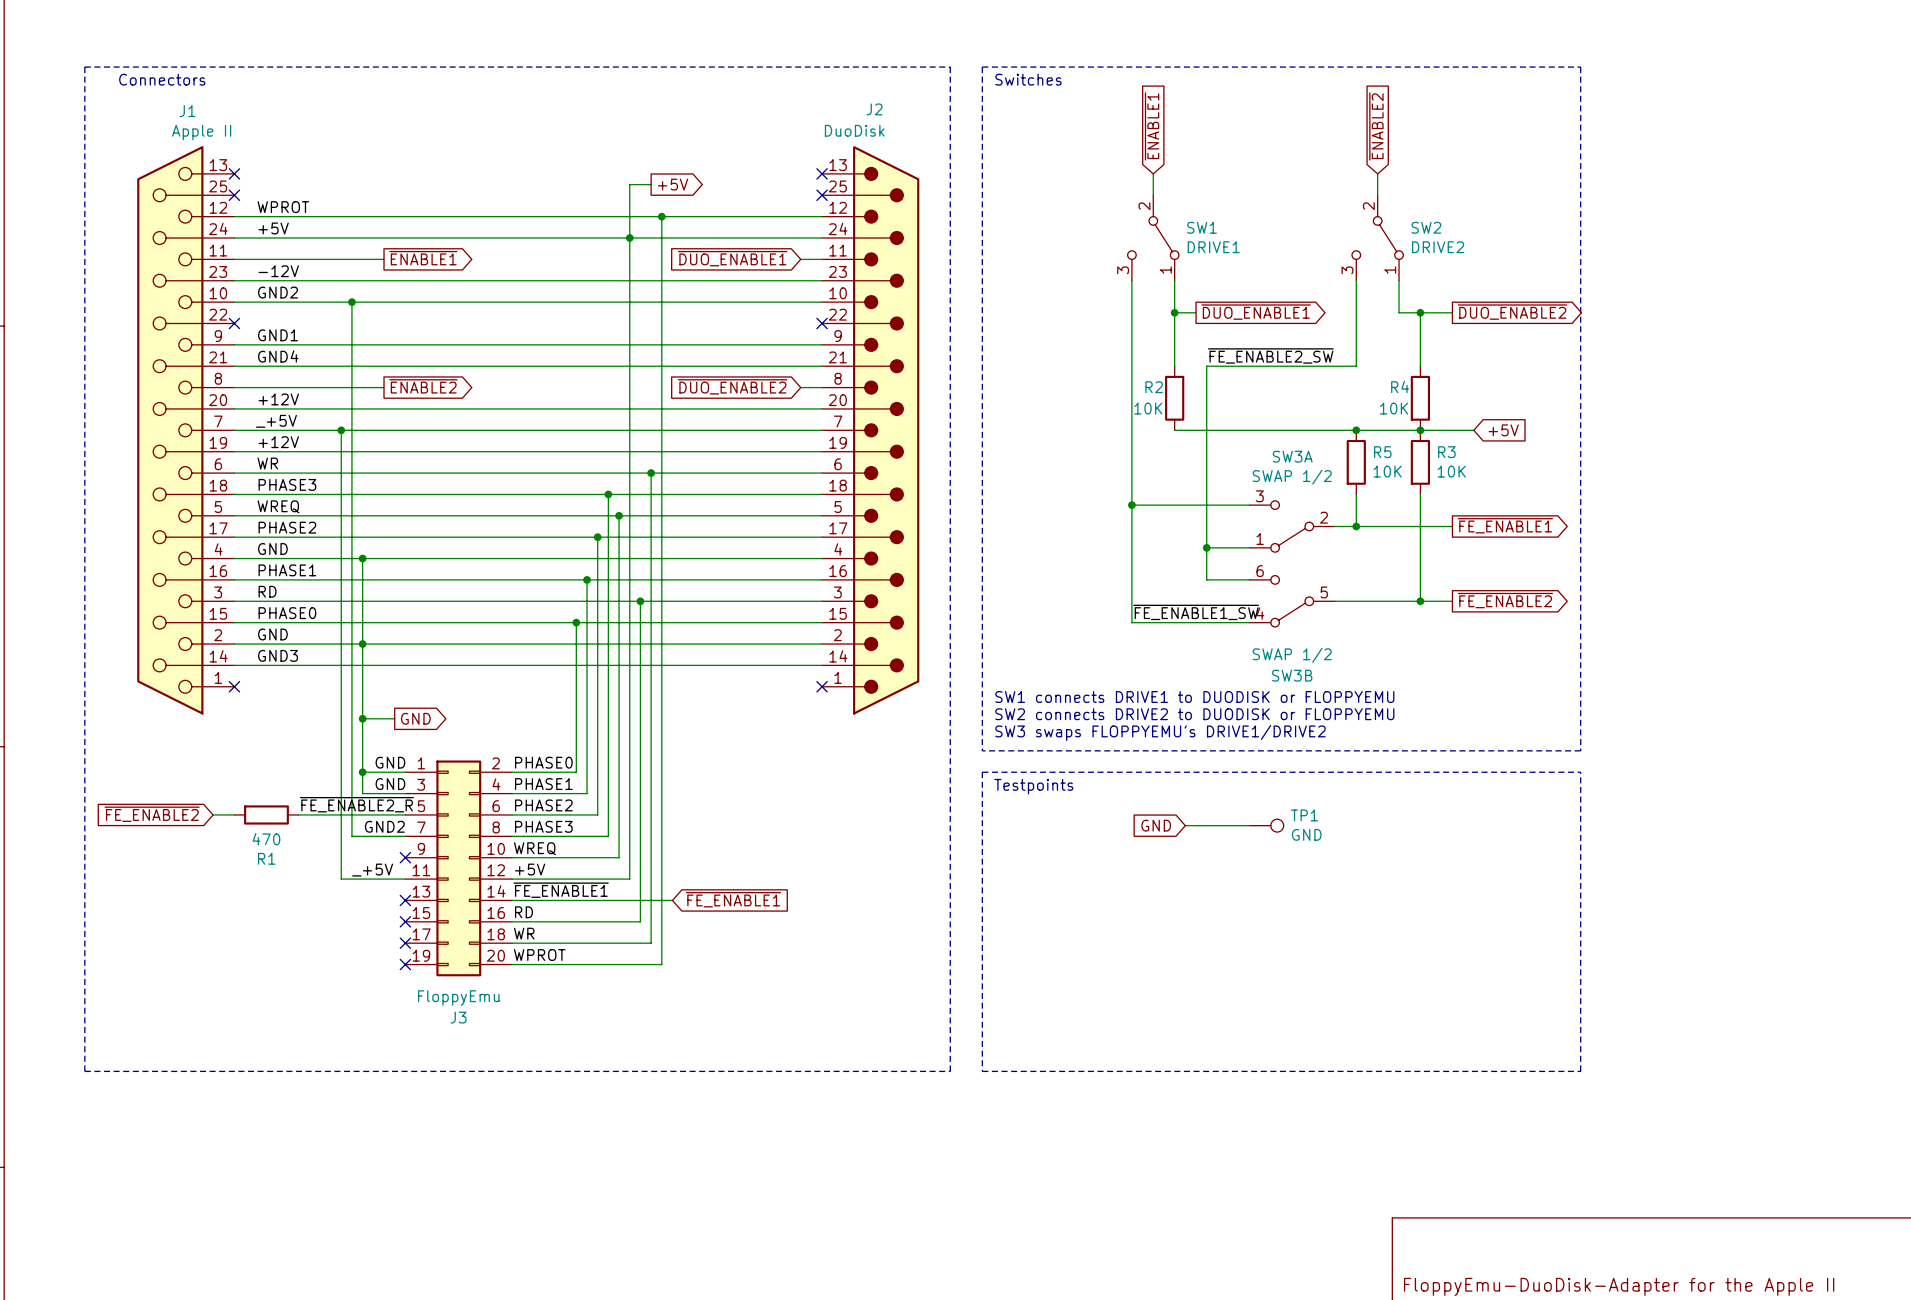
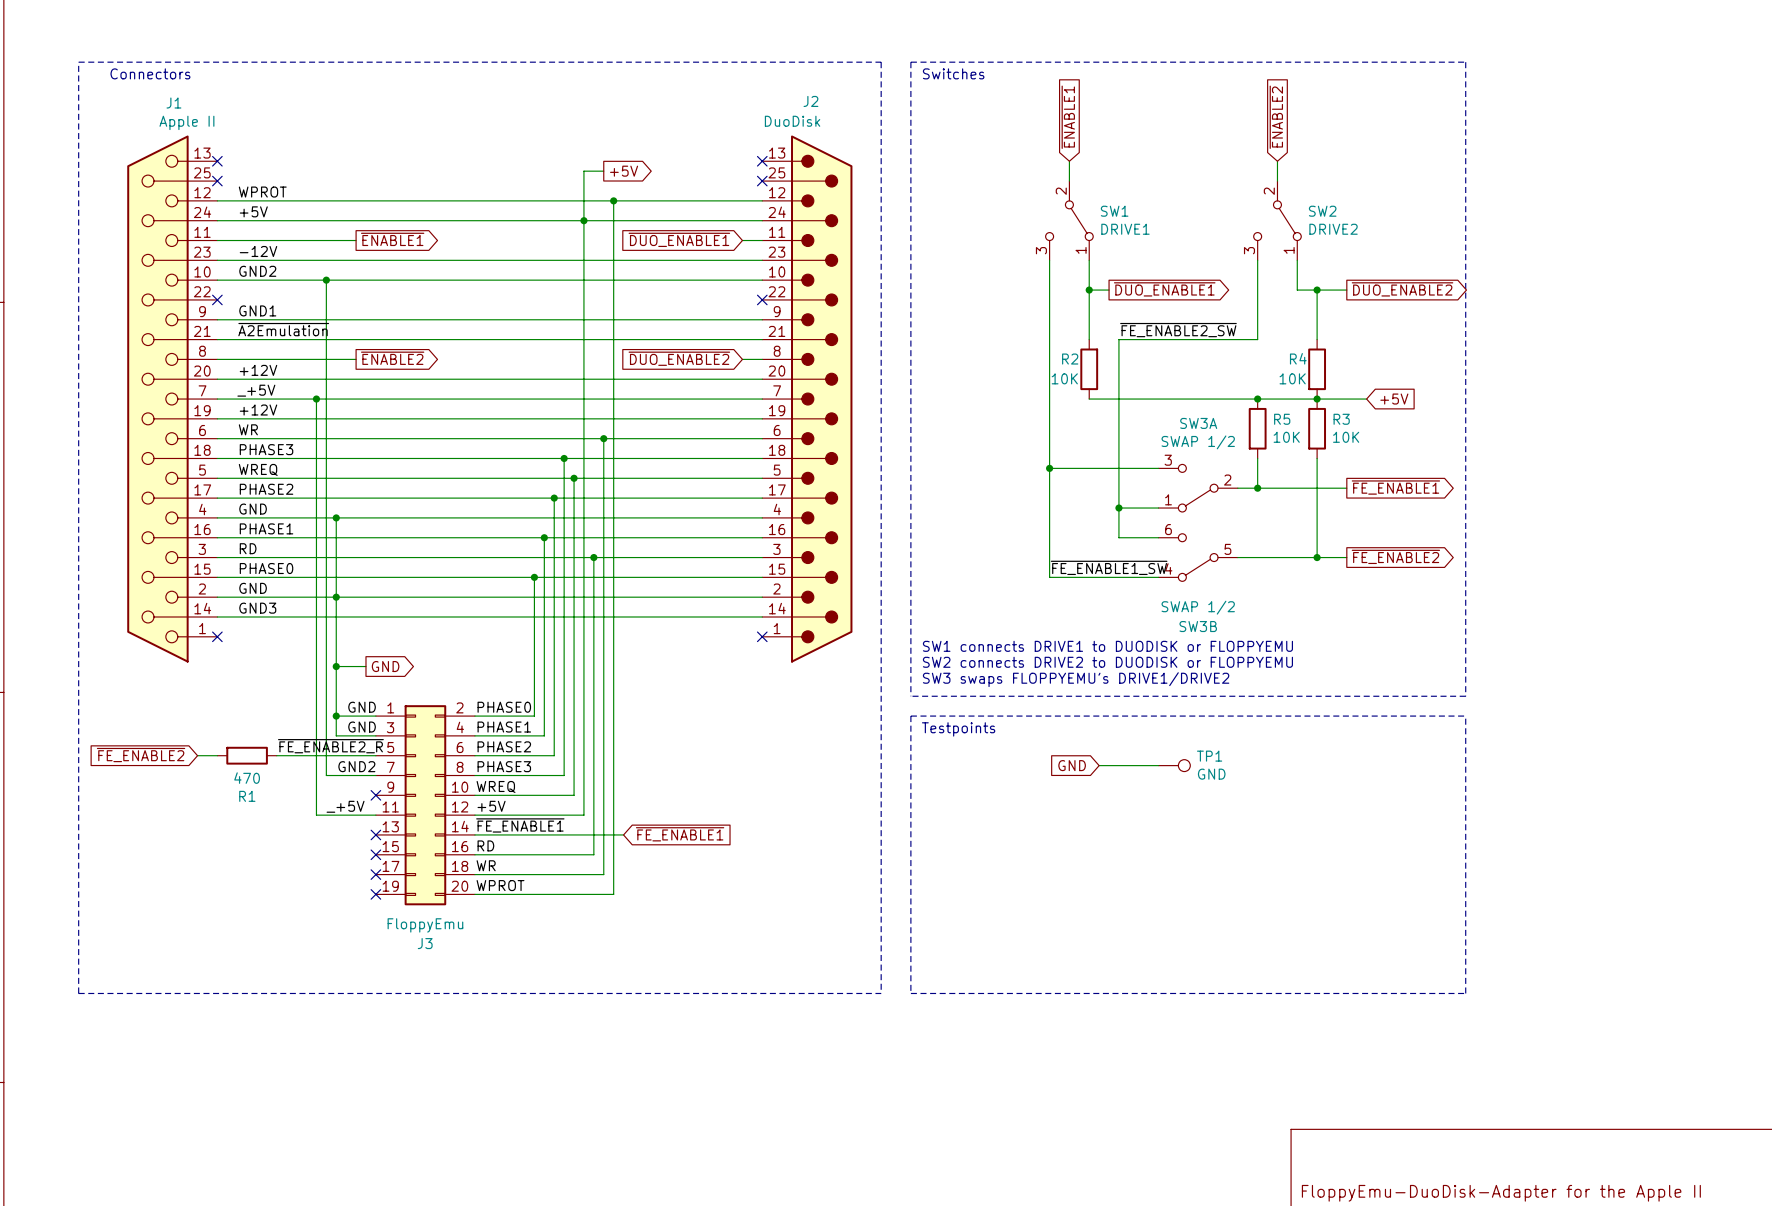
label: GND4 (278, 356) -> ~{A2Emulation} (283, 329)

